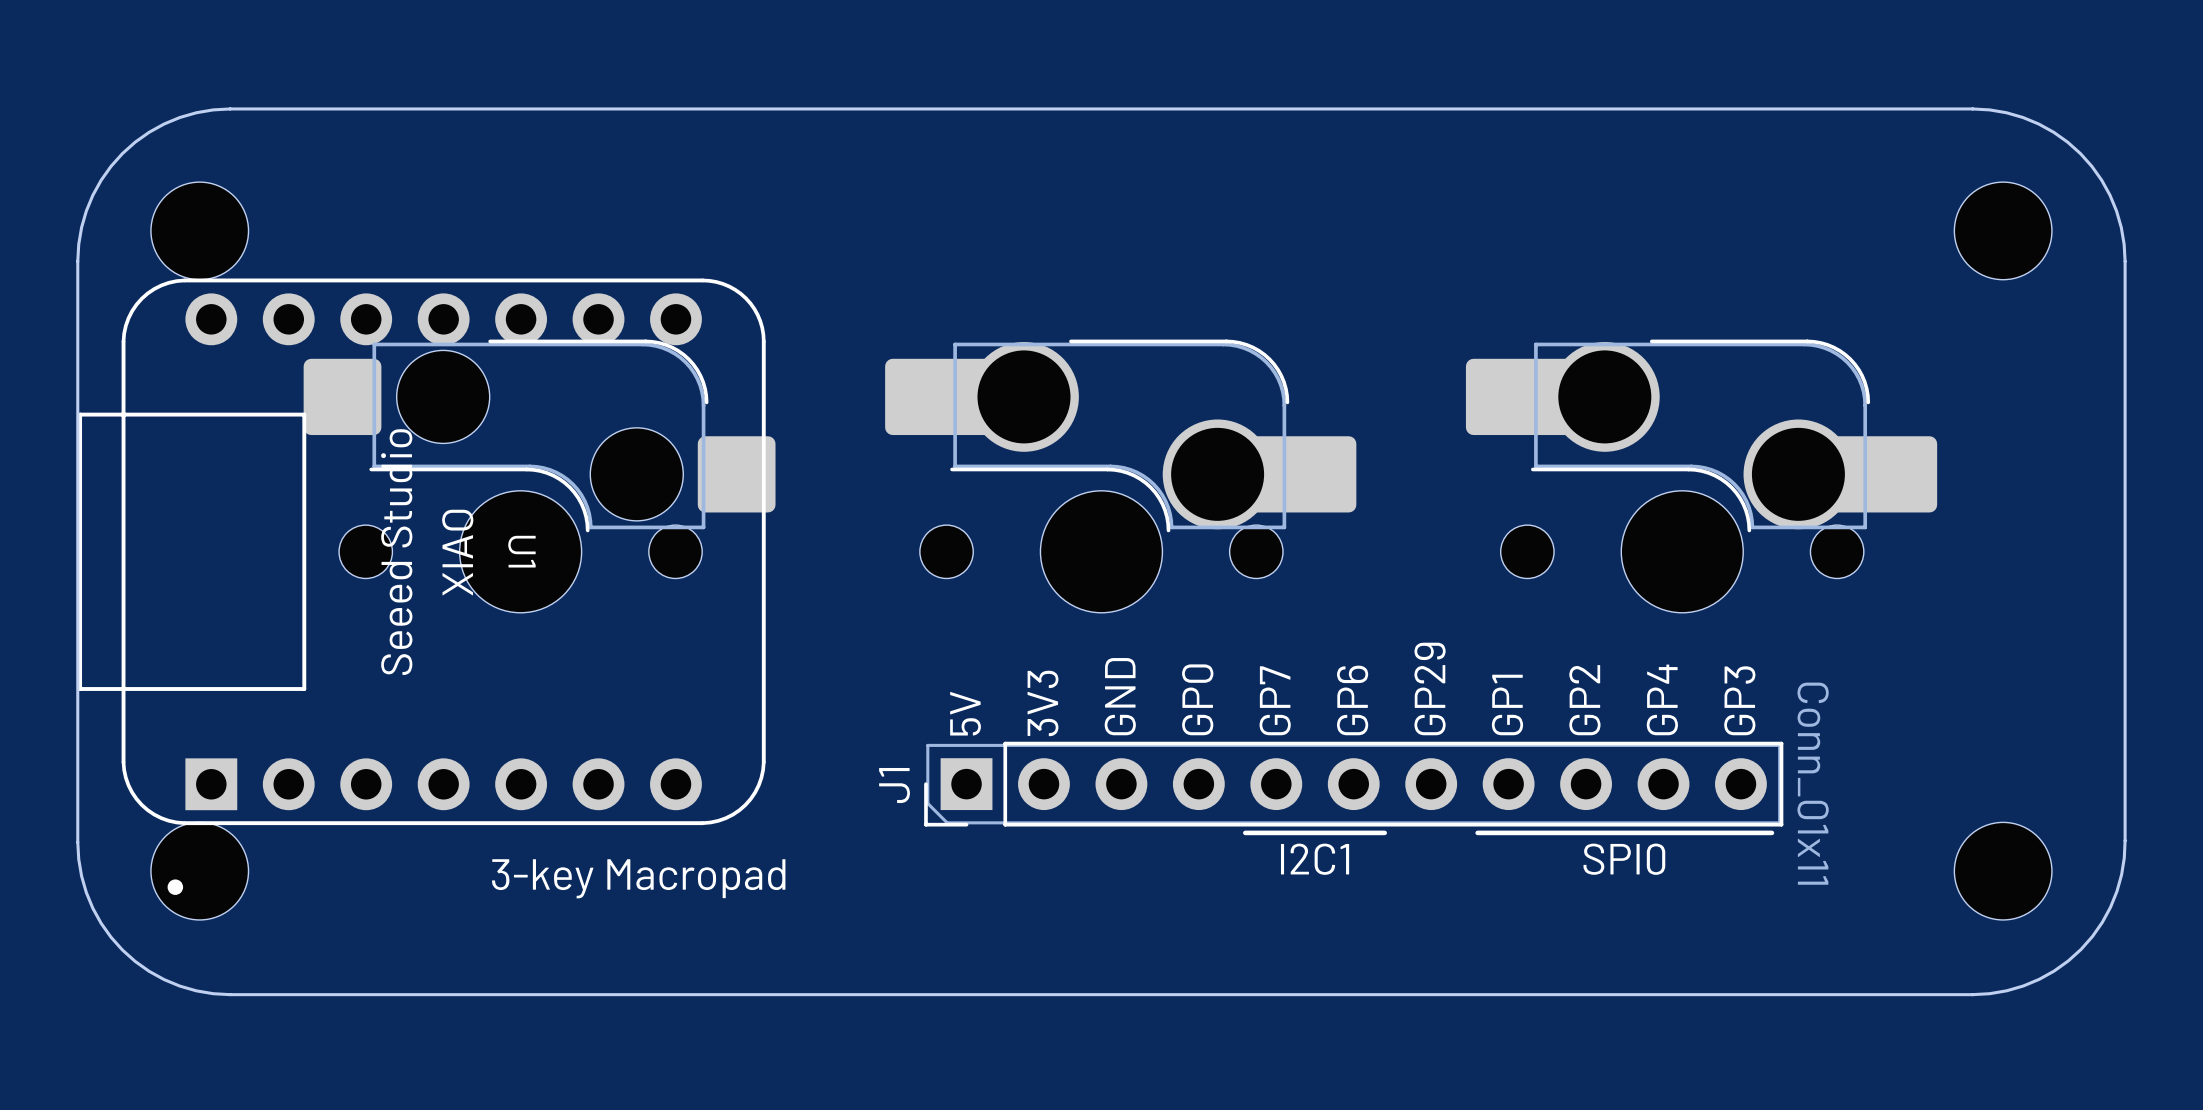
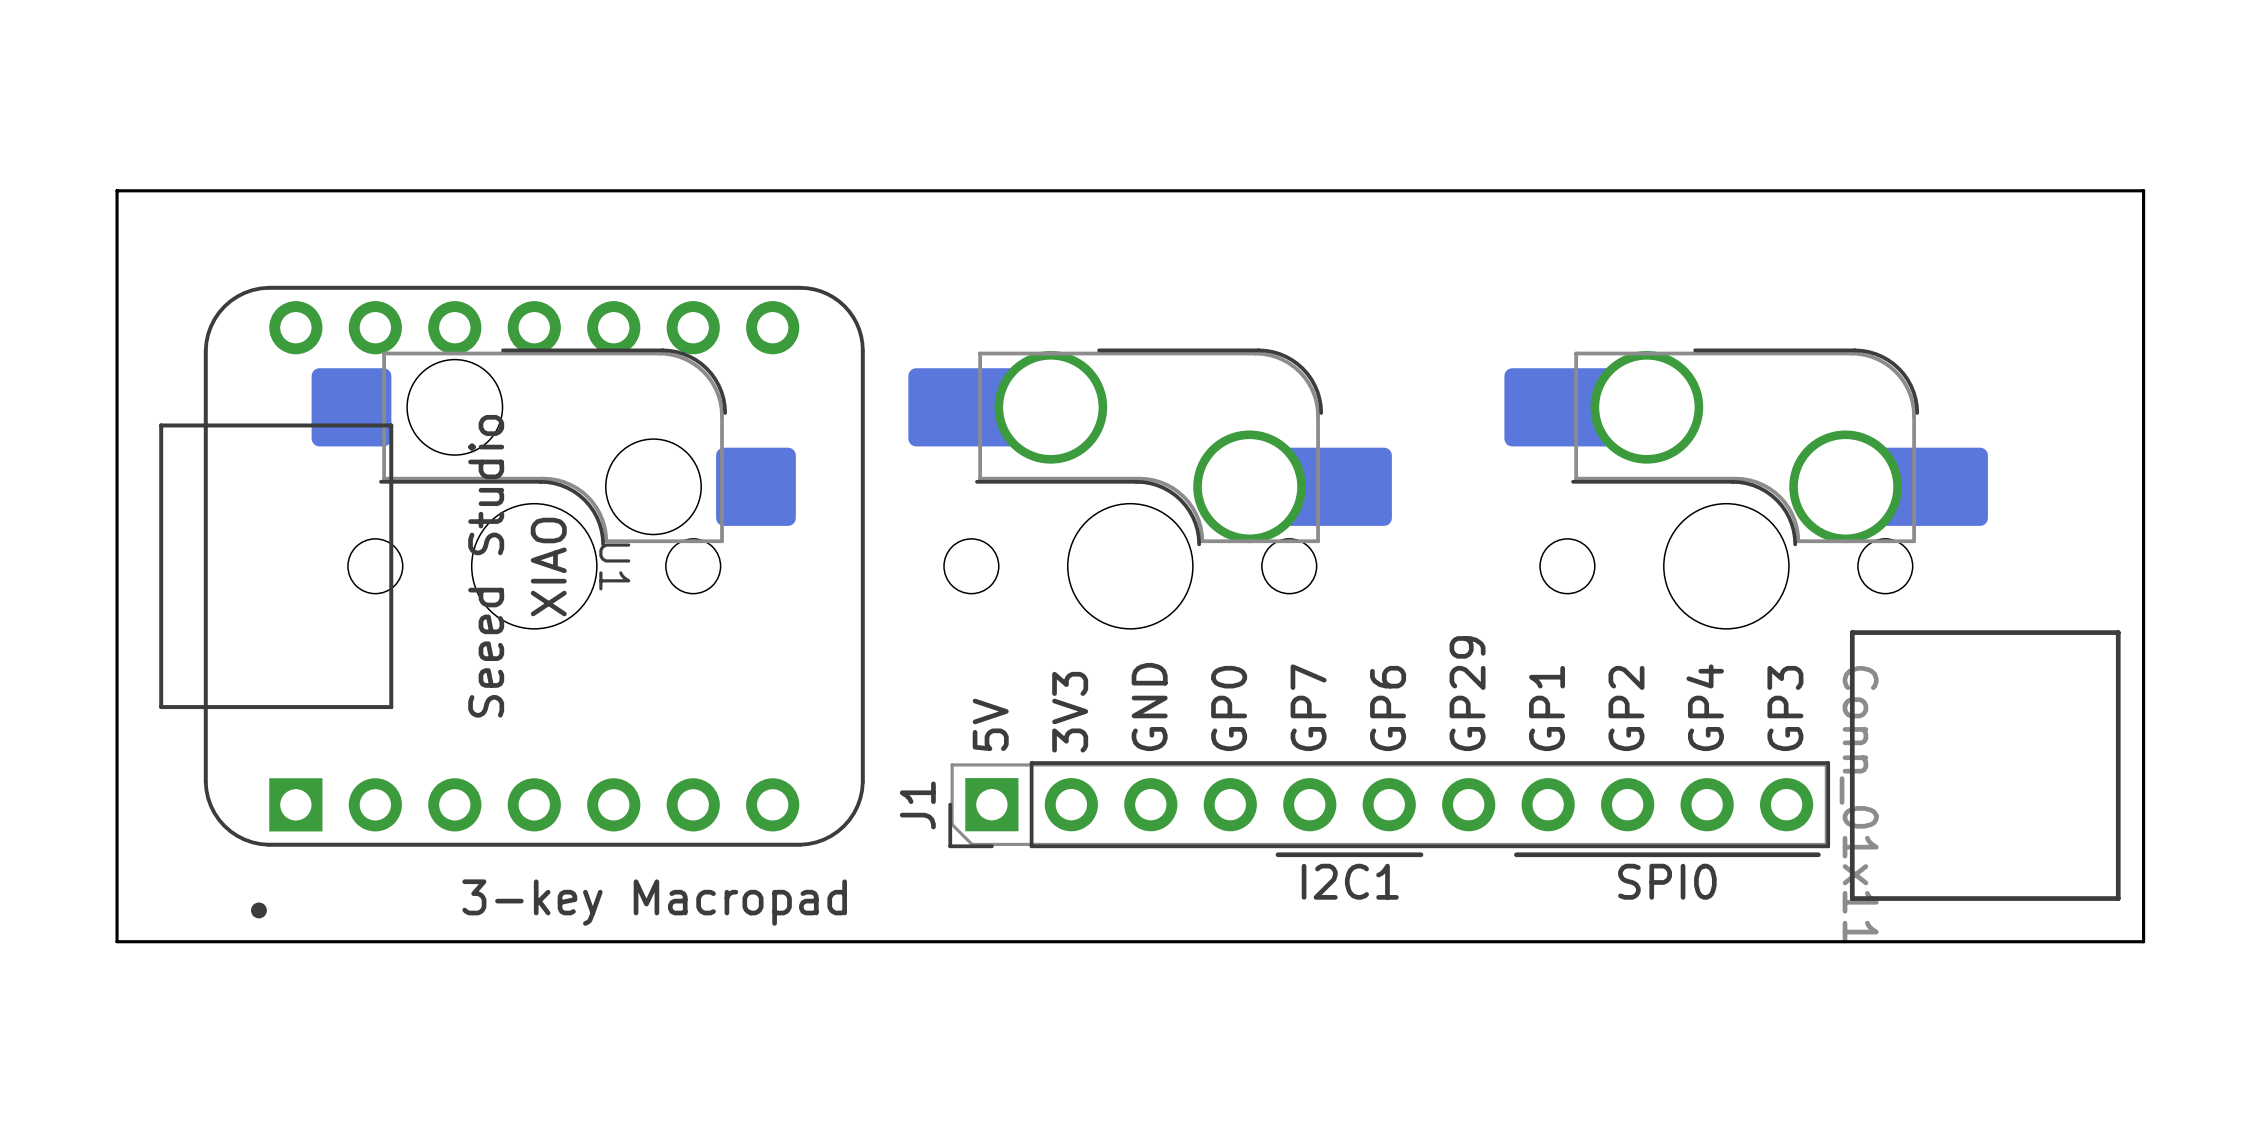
board edge: (1972, 108) (230, 108) (196, 112) (164, 124) (149, 132) (122, 153) (101, 180) (86, 211) (78, 244) (77, 842) (81, 876) (92, 908) (101, 923) (122, 950) (149, 971) (164, 979) (196, 990) (230, 994) (1972, 994) (2006, 990) (2039, 979) (2068, 960) (2092, 936) (2110, 907) (2121, 874) (2124, 857) (2124, 244) (2121, 227) (2110, 195) (2091, 166) (2080, 153) (2053, 132) (2023, 117) (1989, 109) (1972, 108) -> (2143, 190) (2143, 941) (117, 941) (117, 190) (2143, 190)
part: (199, 230) -> none
part: (2003, 230) -> none
U1 position: (421, 586) -> (512, 602)
line: none -> (2118, 632) (1852, 632) (1852, 898) (2118, 898) (2118, 632)
part: (199, 871) -> none
part: (2003, 871) -> none

